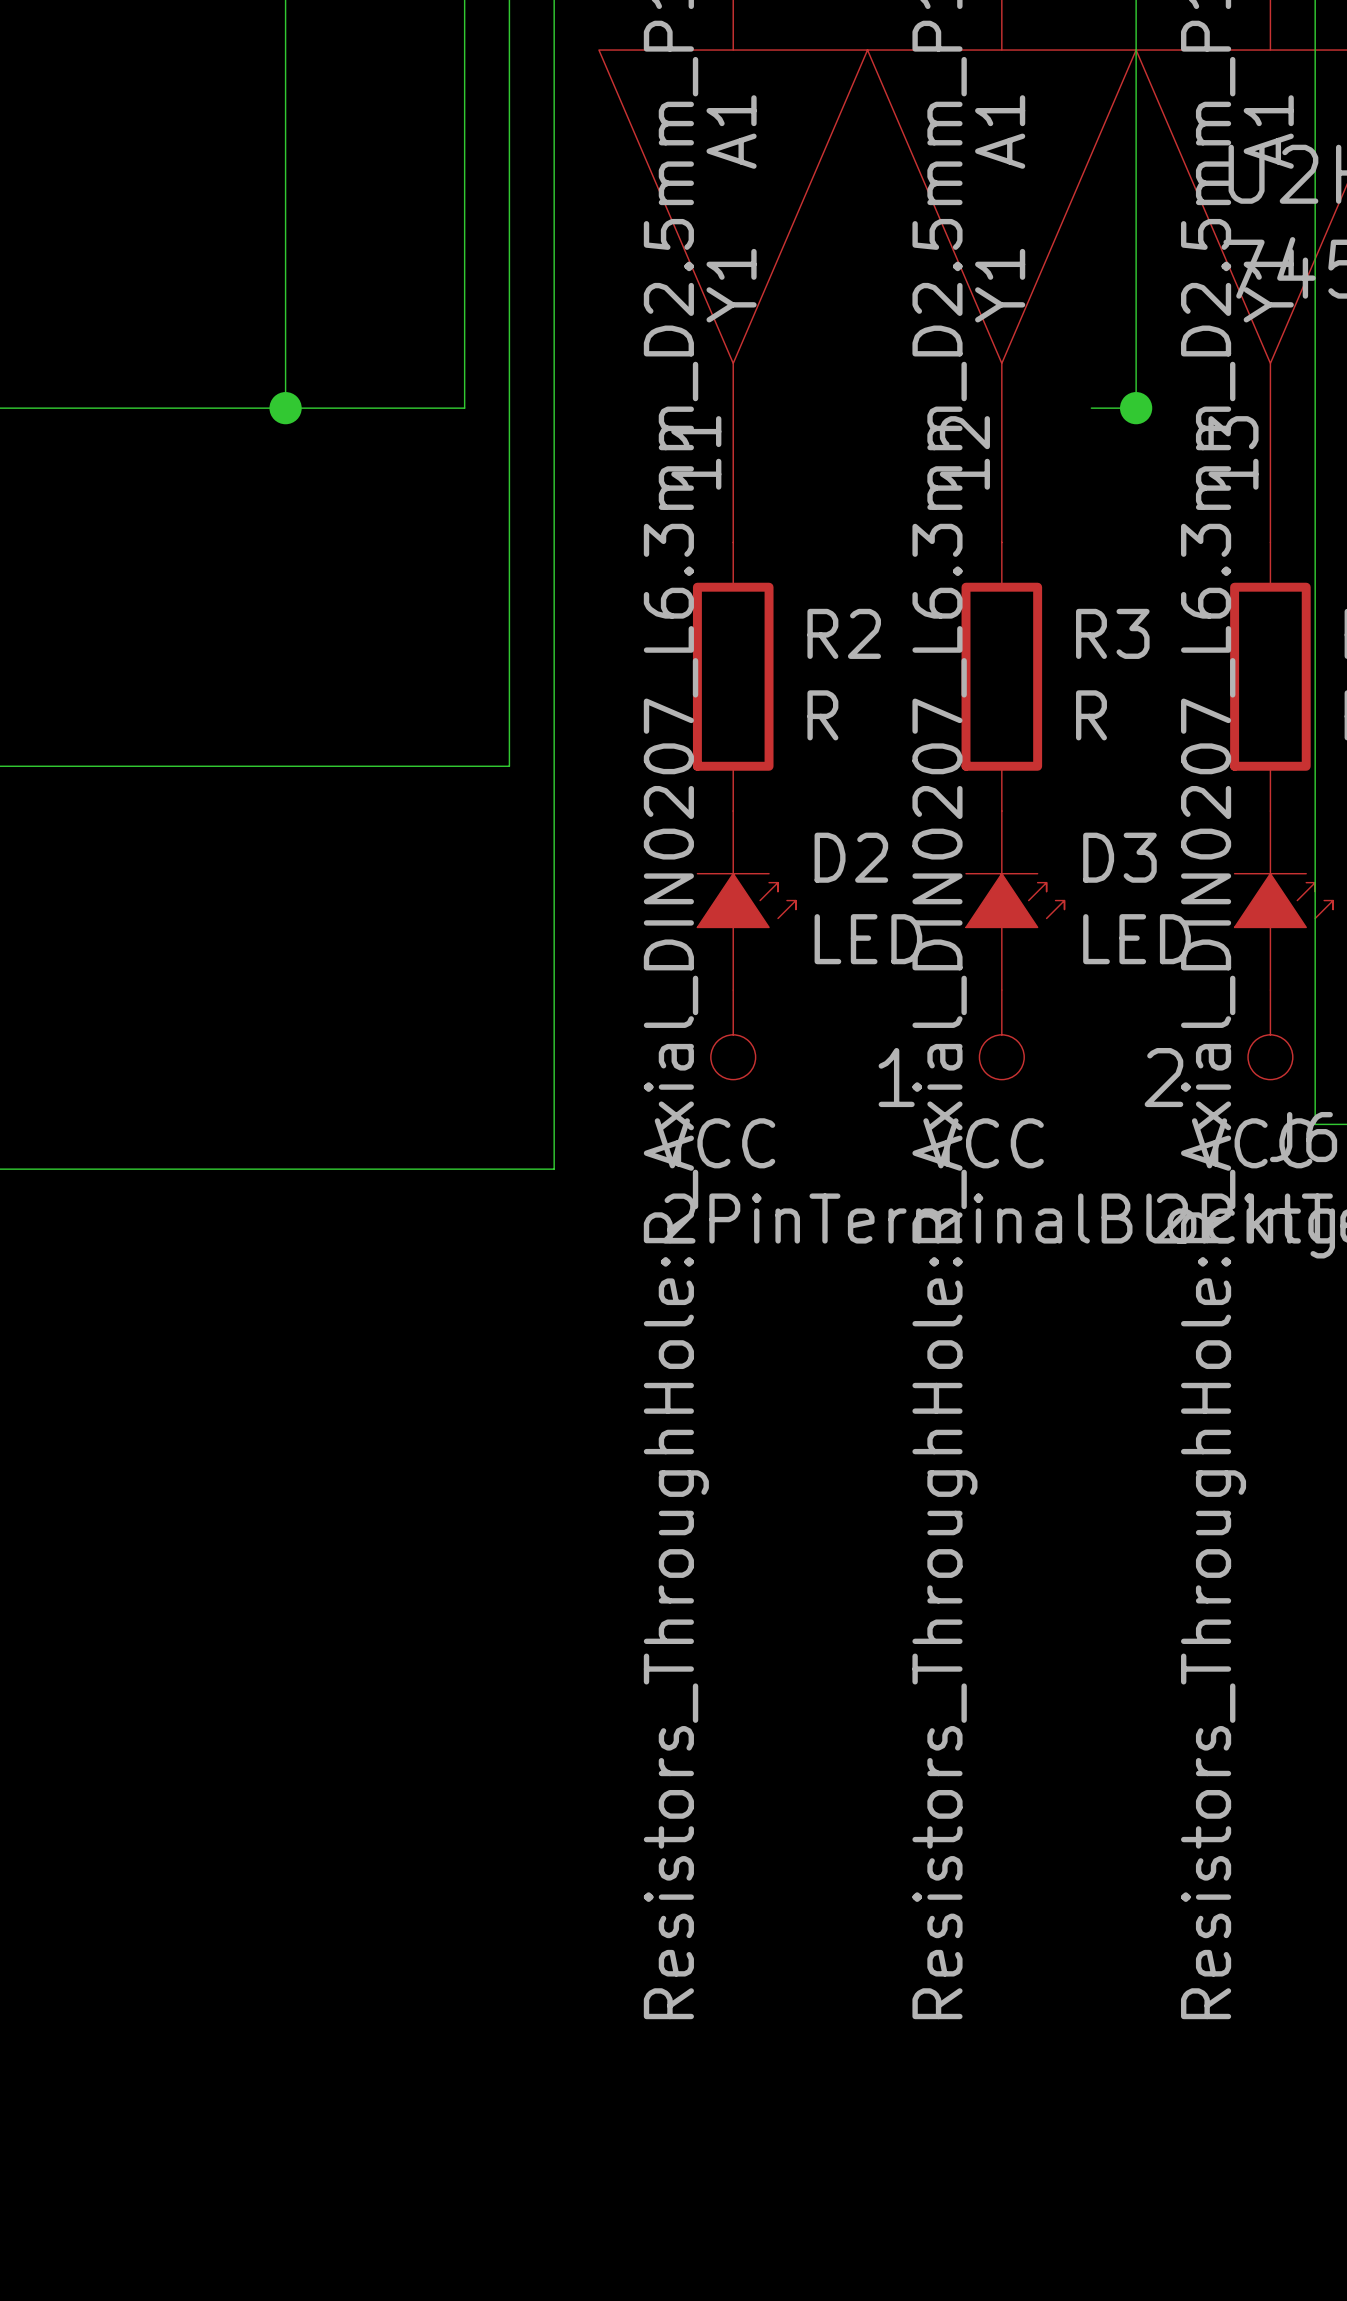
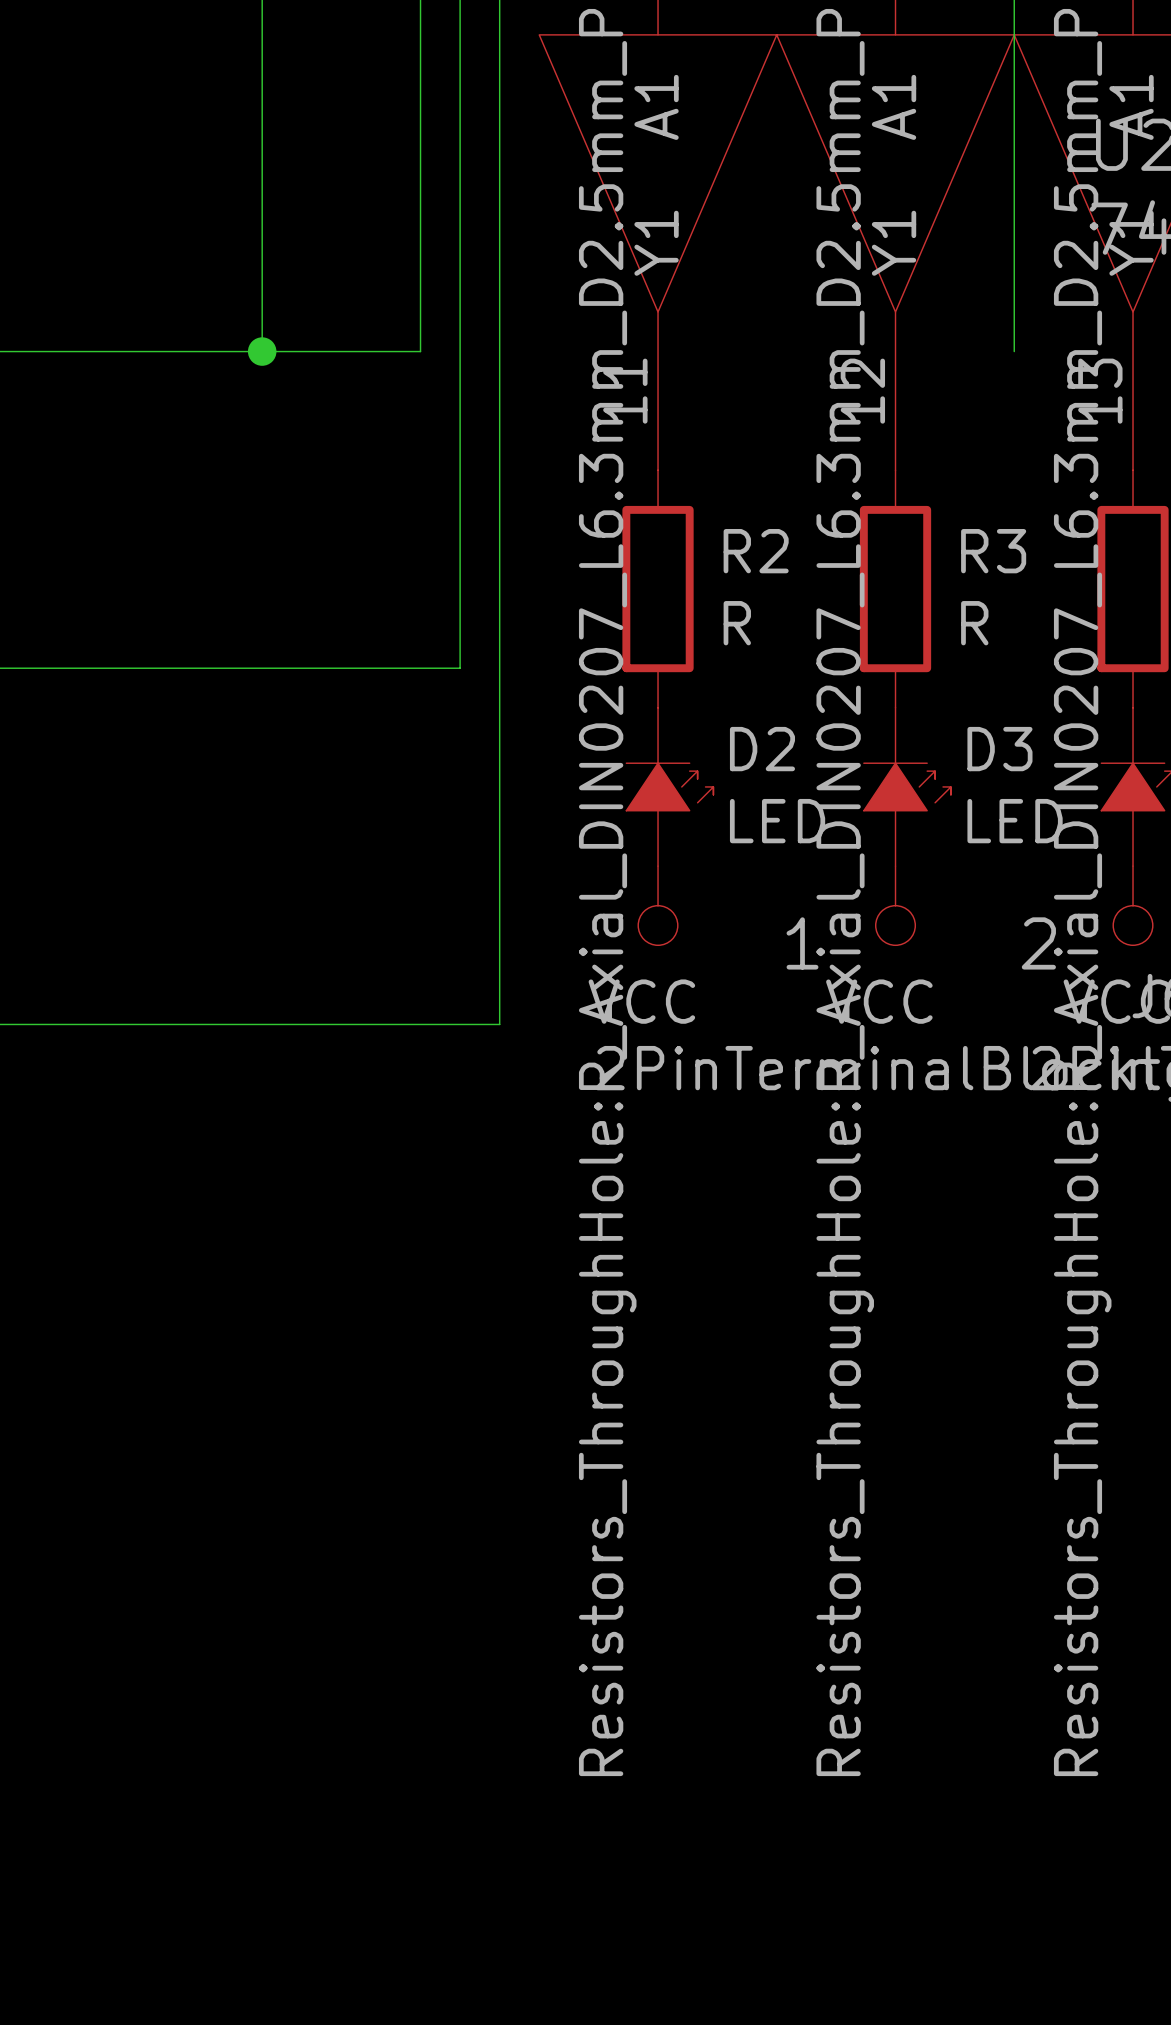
wire: (1091, 408) (1136, 408) -> none
junction: (1136, 408) -> none

